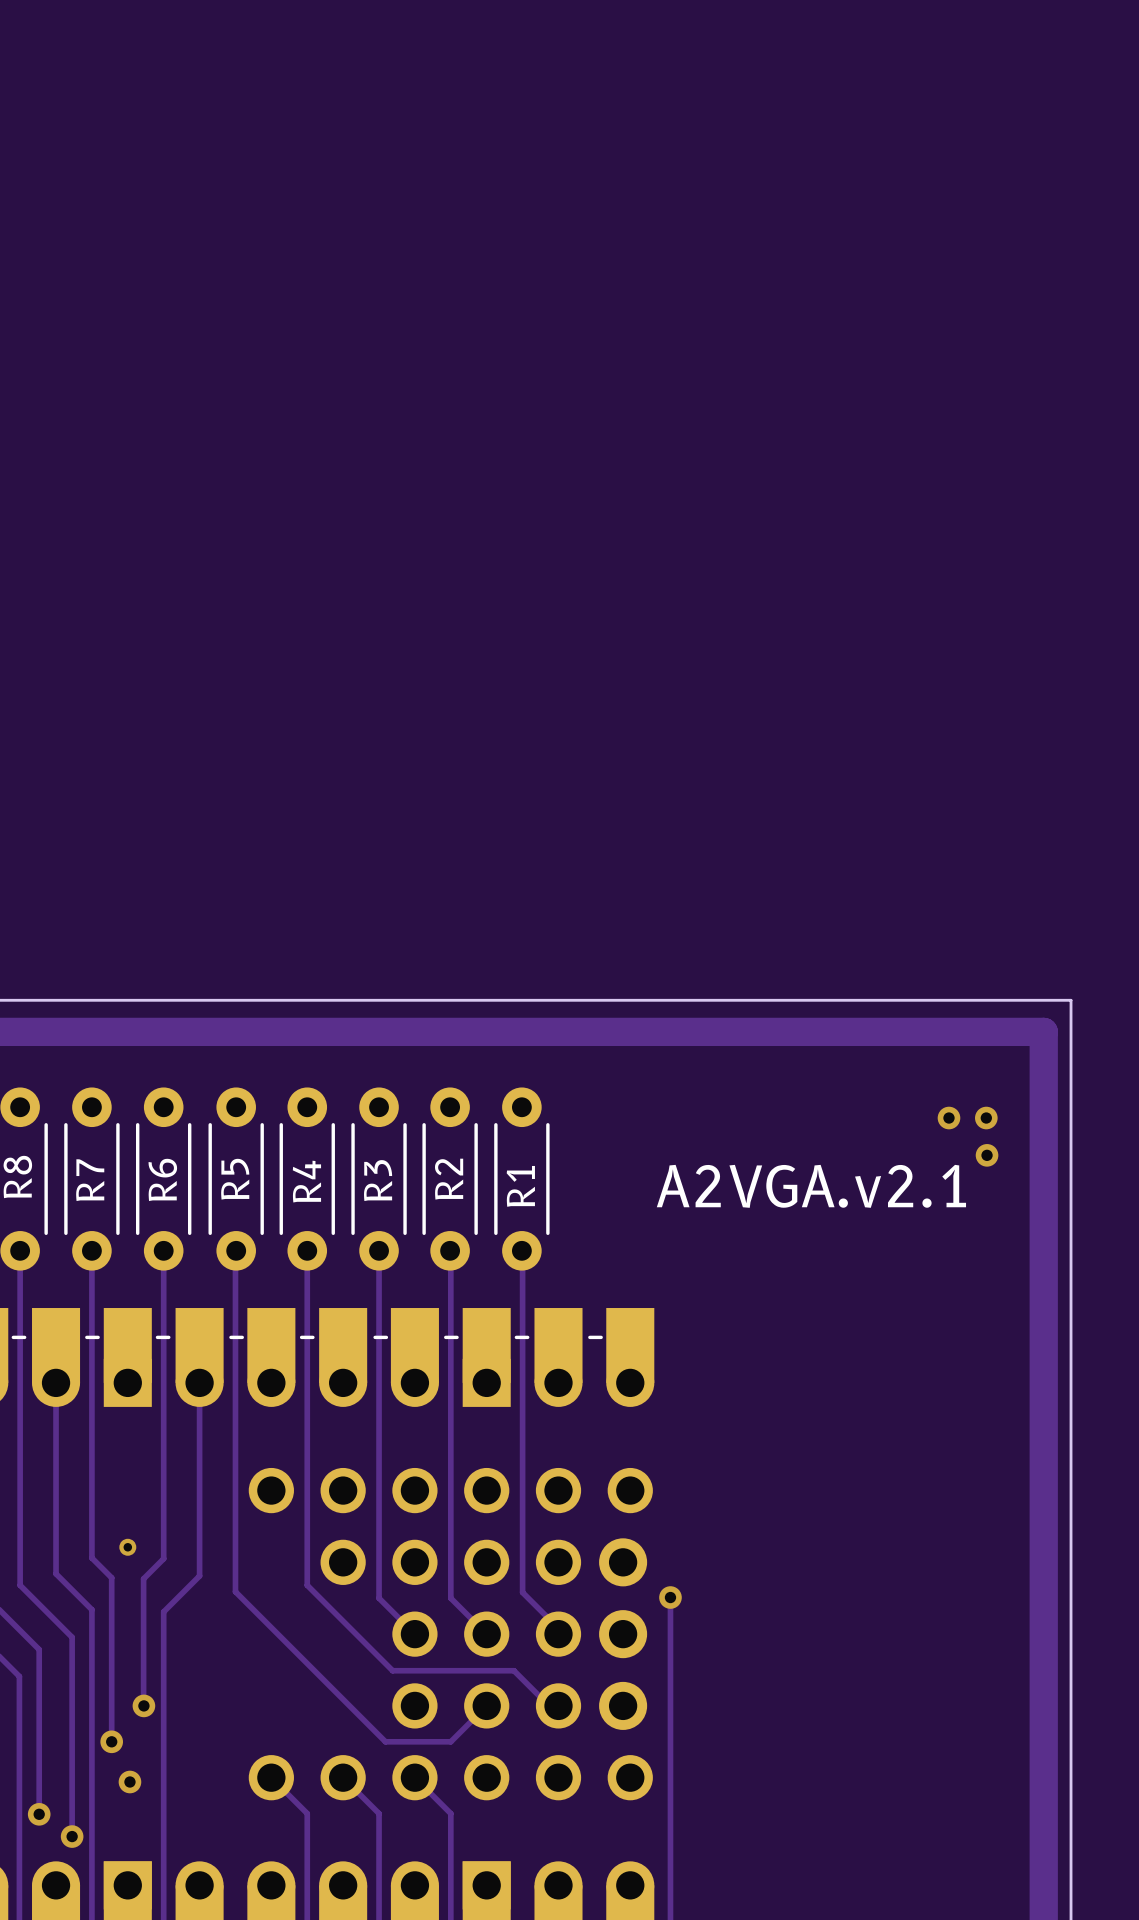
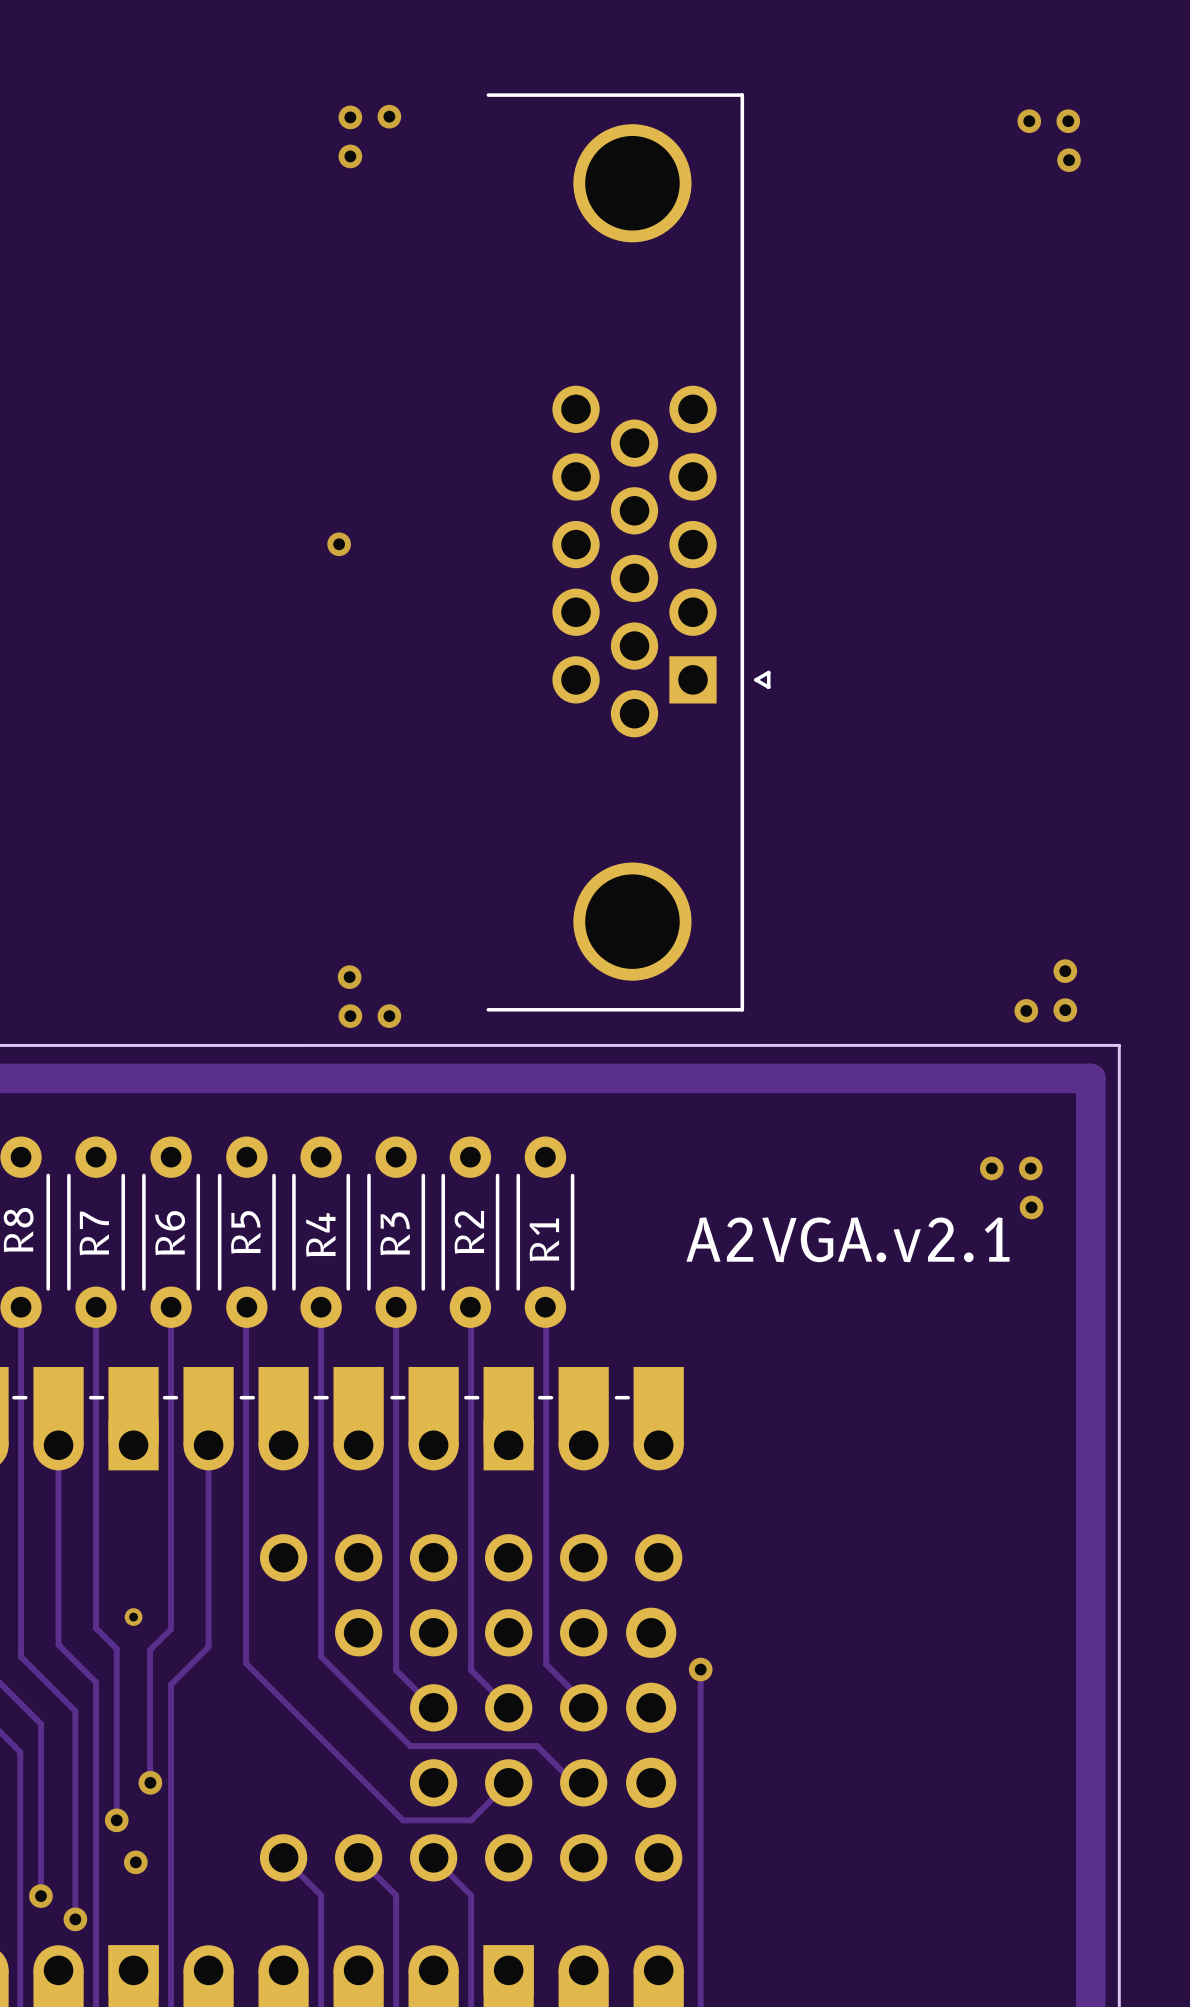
via: none -> (389, 116)
via: none -> (350, 117)
via: none -> (1029, 121)
via: none -> (1068, 121)
via: none -> (350, 156)
via: none -> (1069, 160)
via: none -> (339, 544)
part: none -> (628, 552)
via: none -> (1065, 971)
via: none -> (349, 977)
via: none -> (1065, 1010)
via: none -> (1026, 1010)
via: none -> (350, 1016)
via: none -> (389, 1016)

